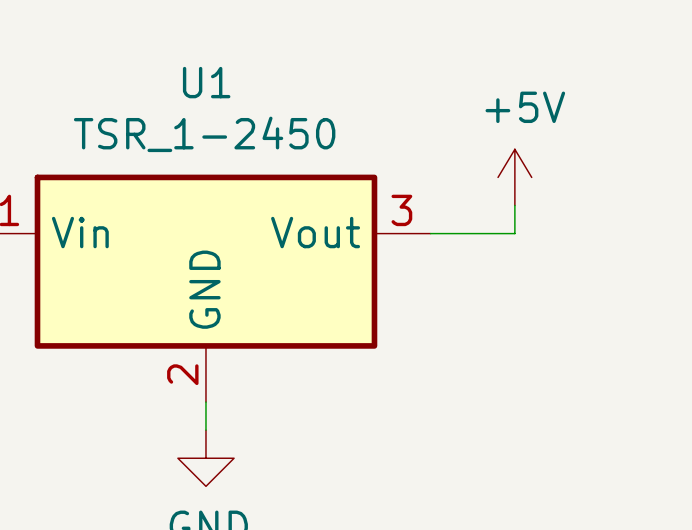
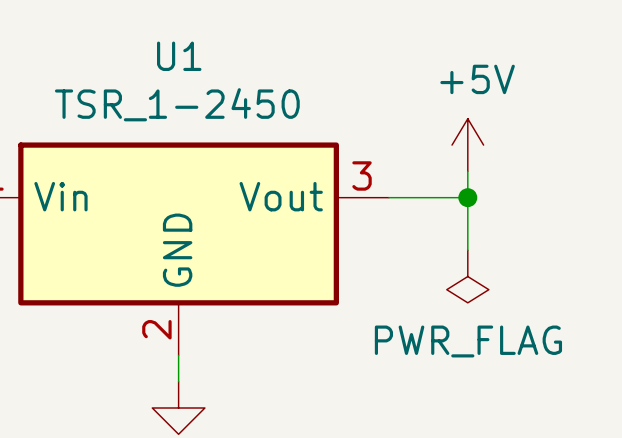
wire: none -> (467, 197) (467, 250)
junction: none -> (467, 197)
power symbol: none -> PWR_FLAG (467, 276)

